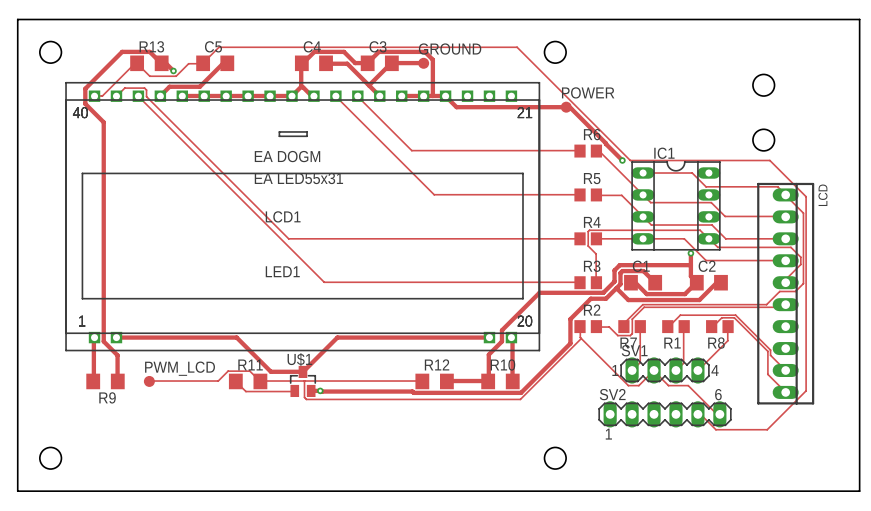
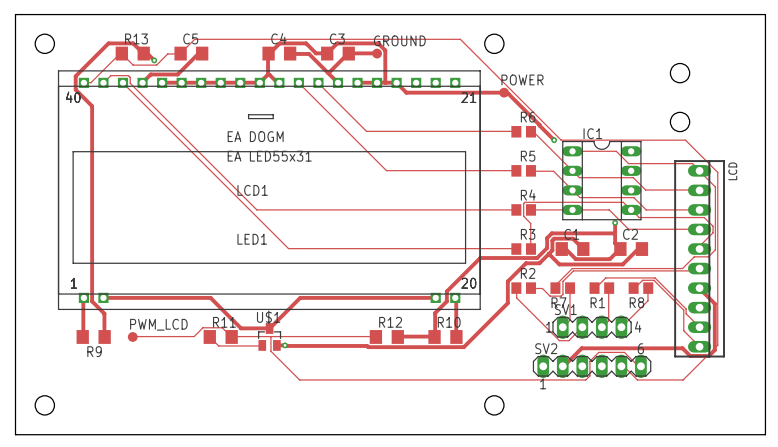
track: none -> (699, 288) (714, 303) (714, 350) (708, 355) (690, 355) (682, 348) (581, 348) (562, 366)
track: (581, 338) (520, 399) (306, 399) -> (624, 352) (598, 352) (589, 361) (589, 375) (585, 379) (299, 379) (272, 353)
track: (654, 370) (668, 385) (688, 385) (701, 398) -> none

